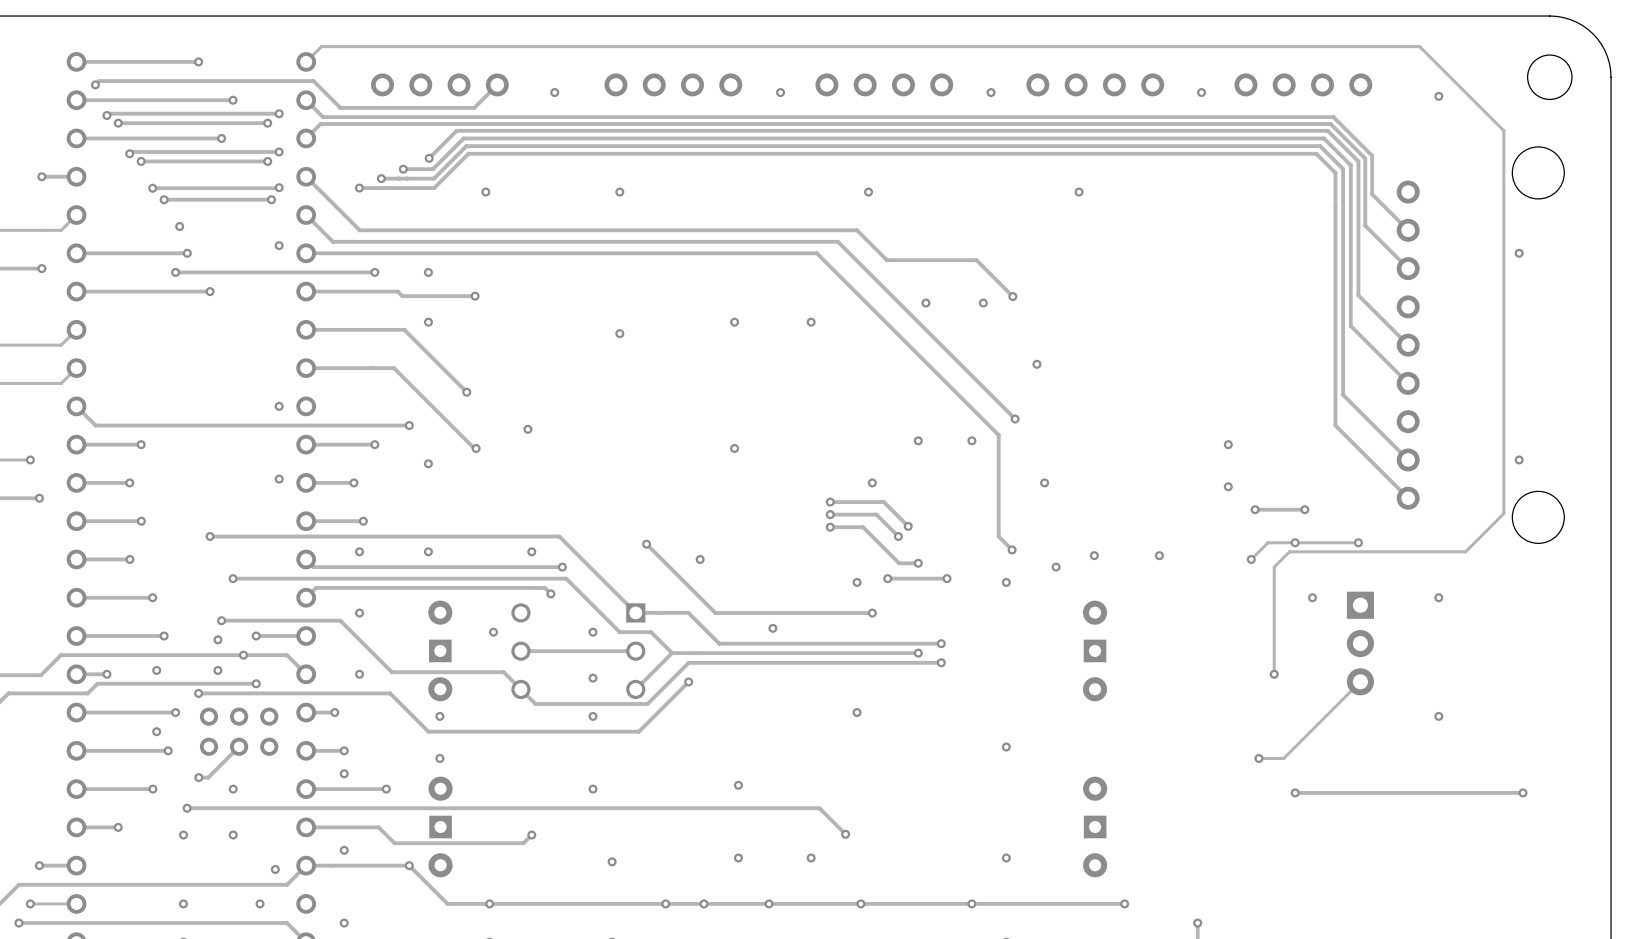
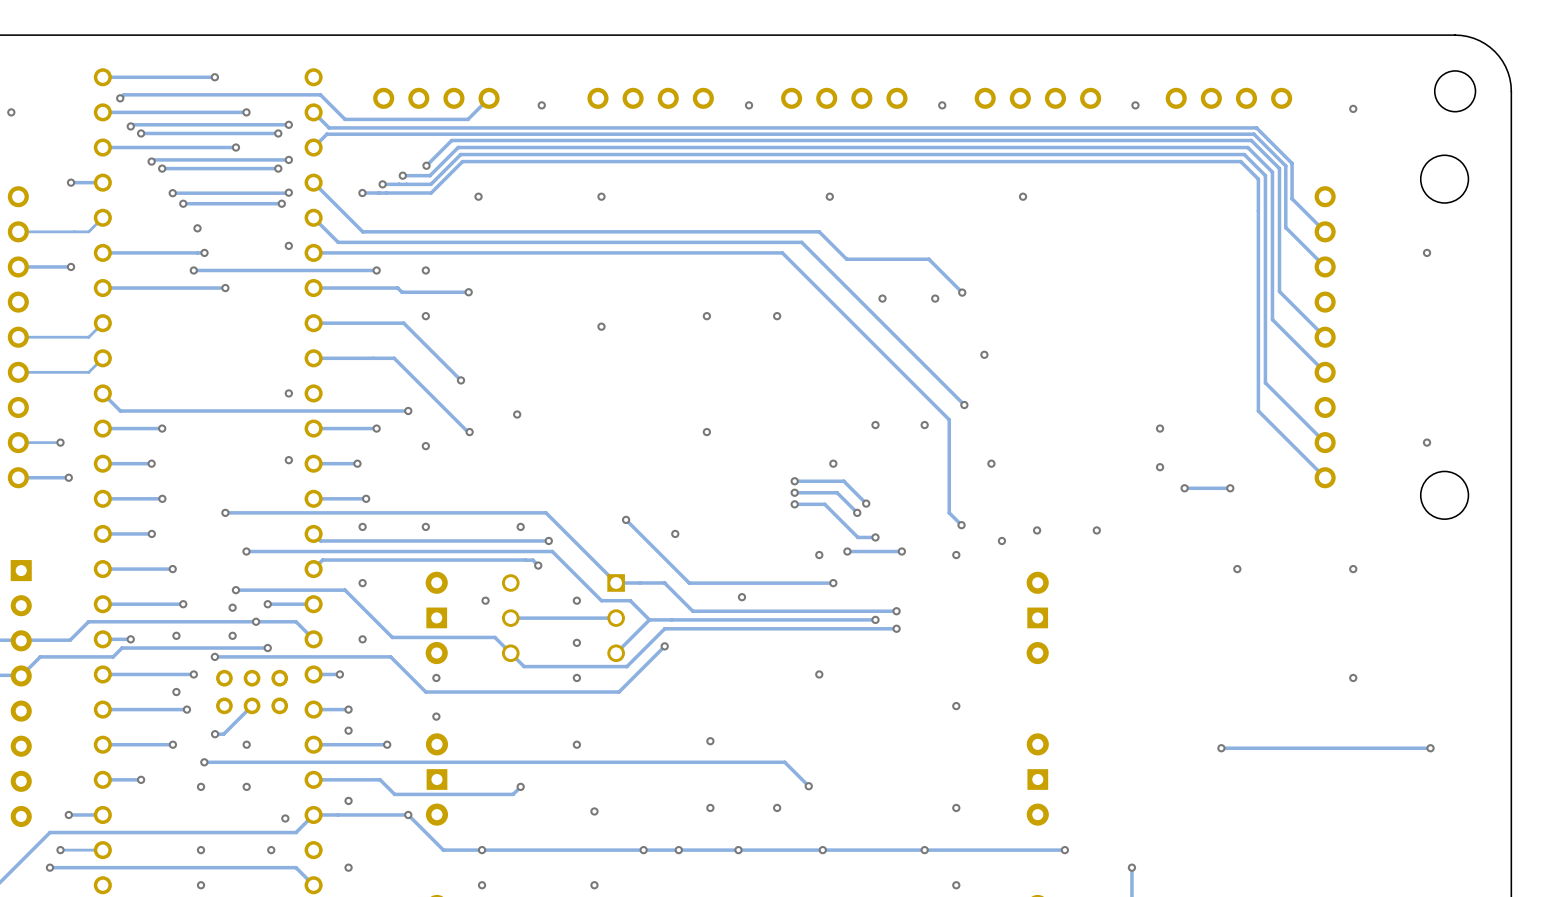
track: (306, 61) (321, 46) (1419, 46) (1503, 130) (1503, 513) (1465, 551) (1289, 551) (1274, 567) (1274, 674) -> none
via: (1295, 542) -> none
track: (1358, 542) (1267, 542) (1251, 559) -> none
via: (1358, 542) -> none
via: (1251, 559) -> none
part: (1360, 643) -> none
via: (1274, 674) -> none
track: (1360, 681) (1283, 758) (1258, 758) -> none
via: (1258, 758) -> none

